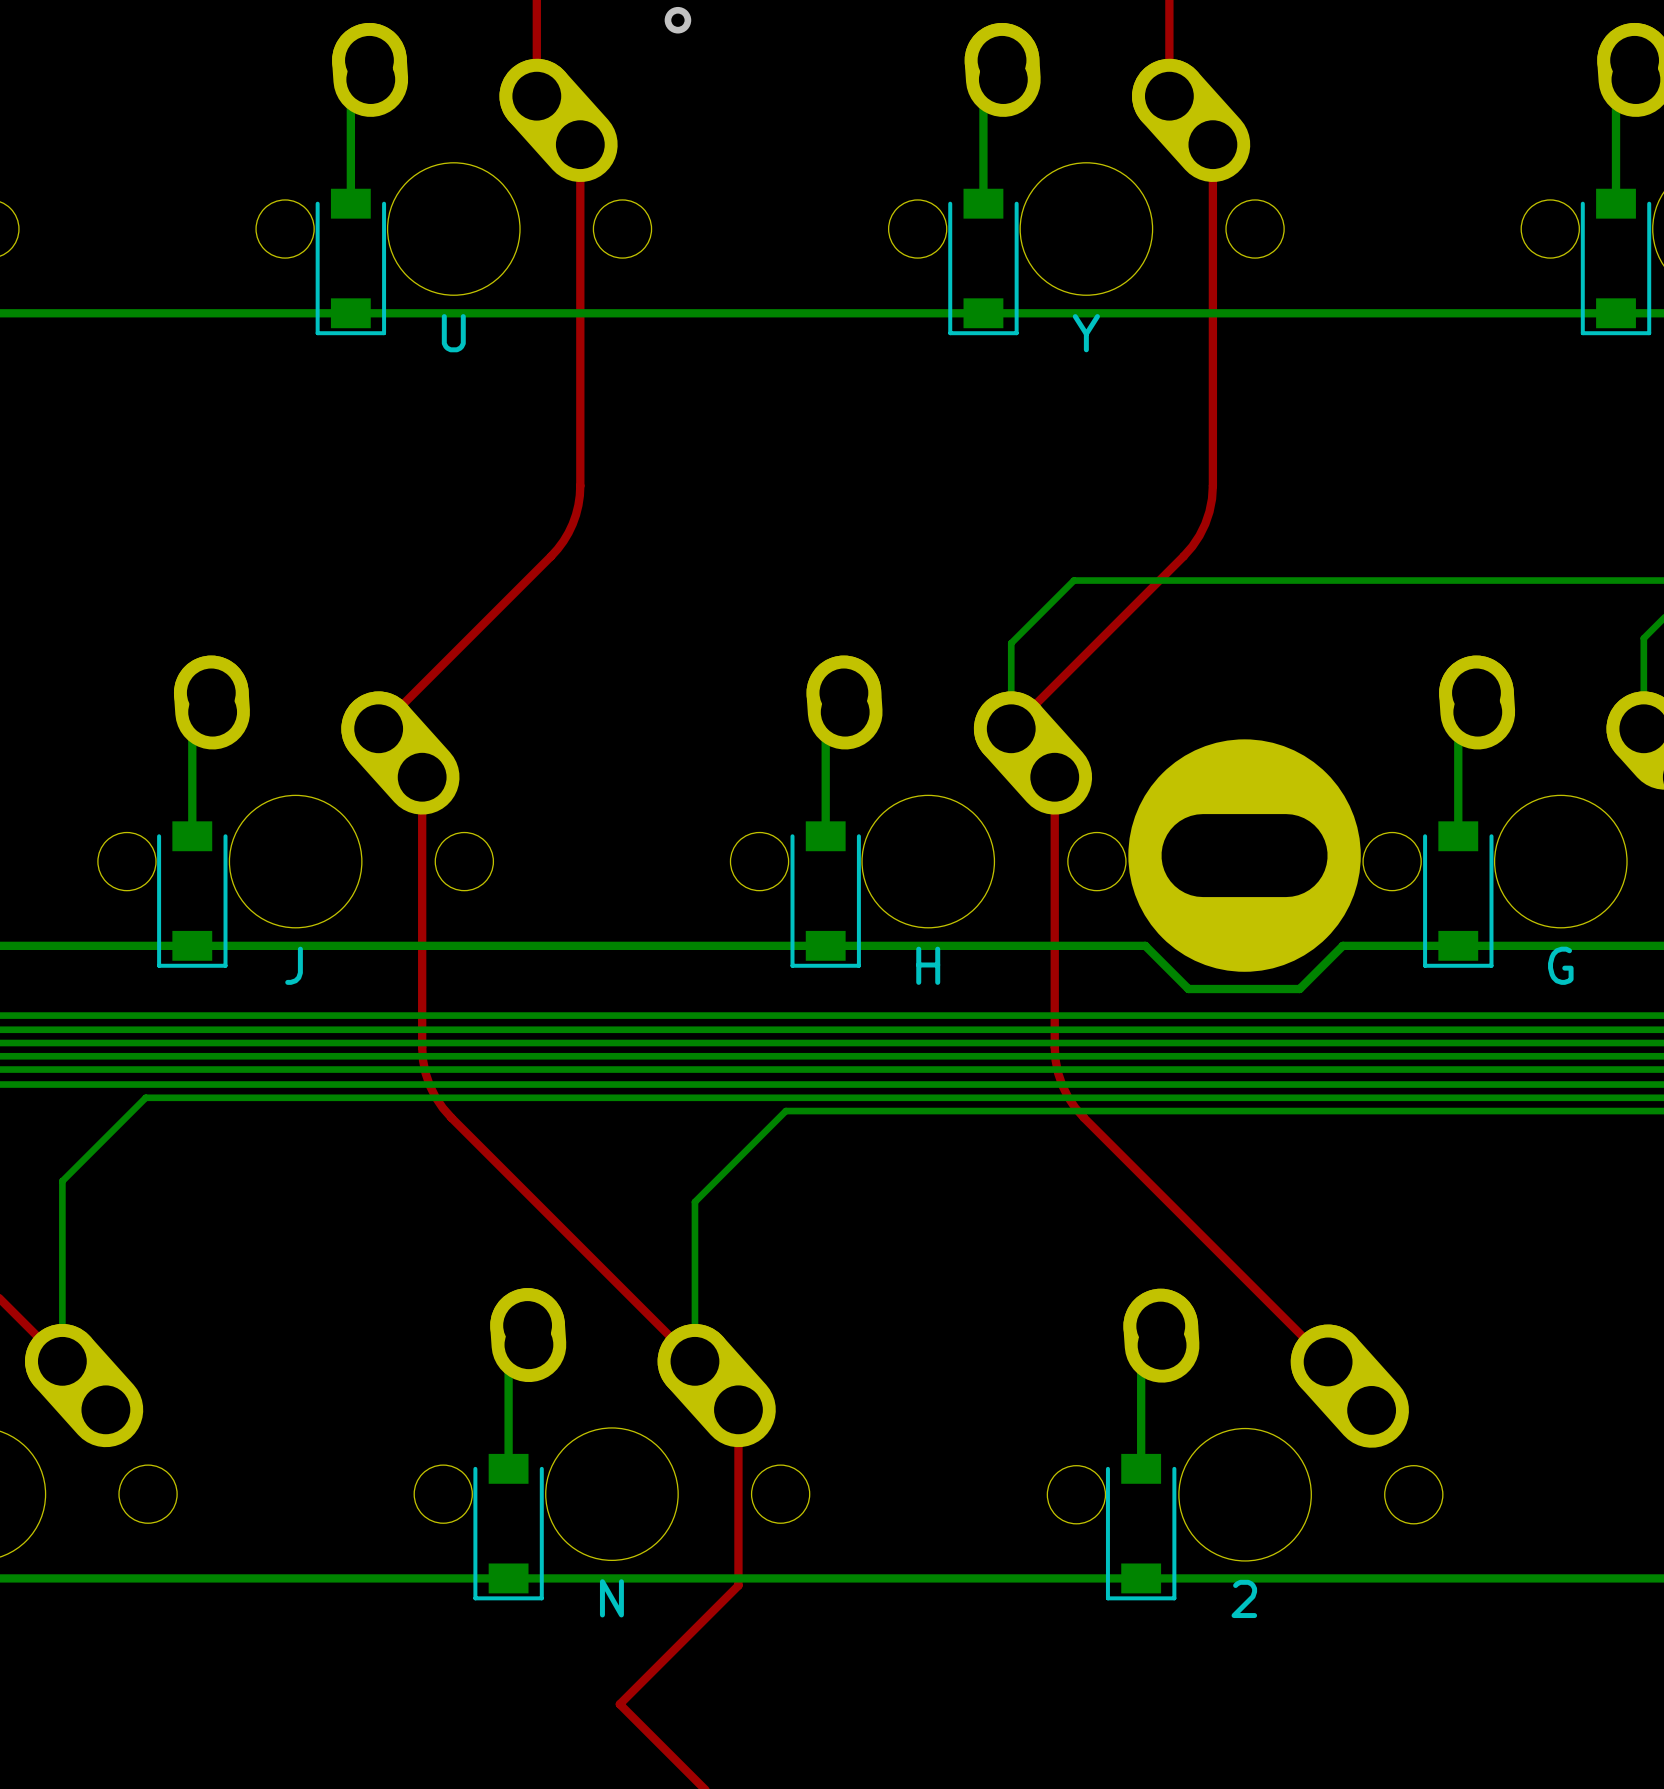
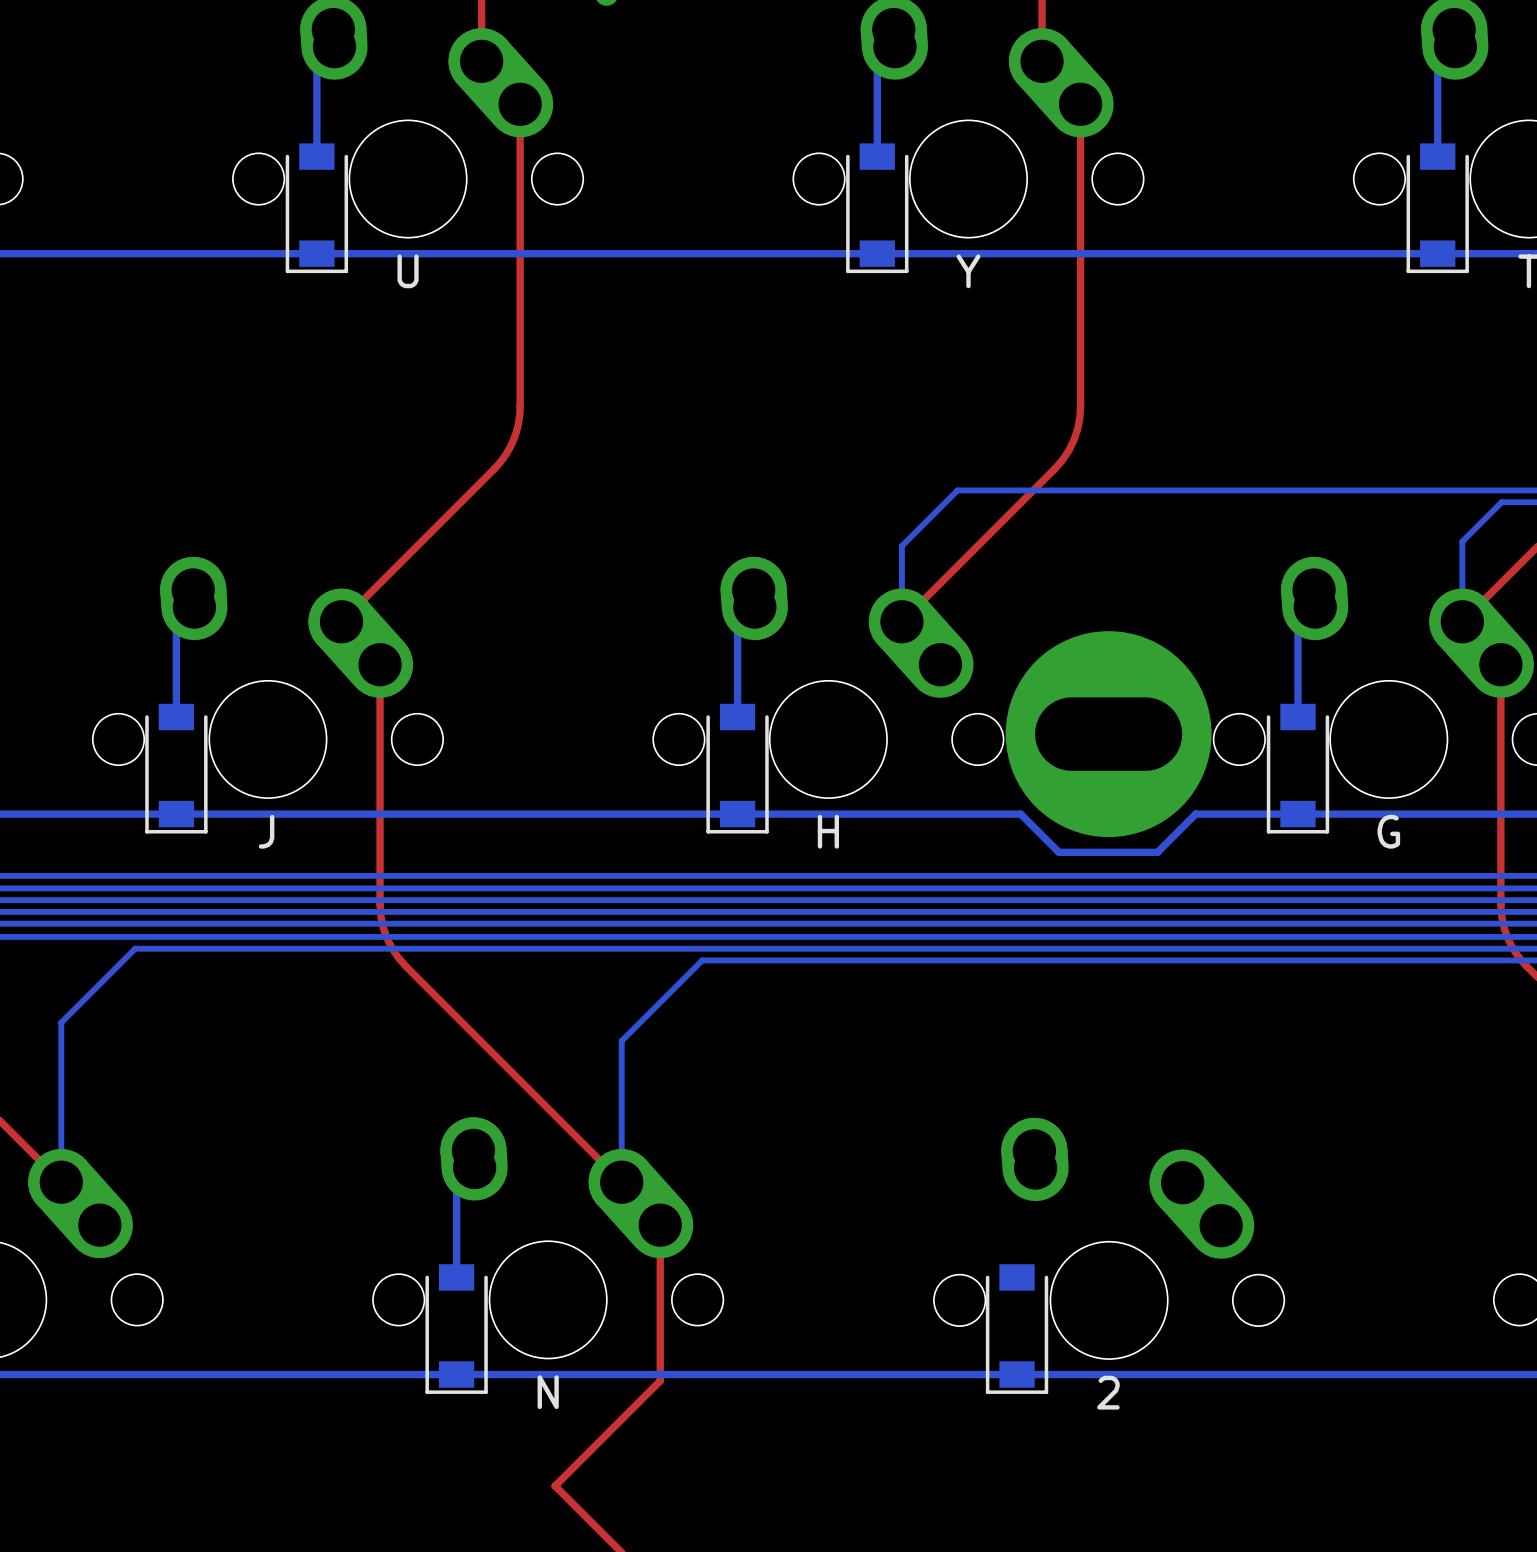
top track: (1054, 777) (1054, 1047) (1055, 1060) (1062, 1085) (1068, 1097) (1083, 1117) (1327, 1361) -> none
bottom track: (1161, 1344) (1141, 1365) (1141, 1468) -> none

